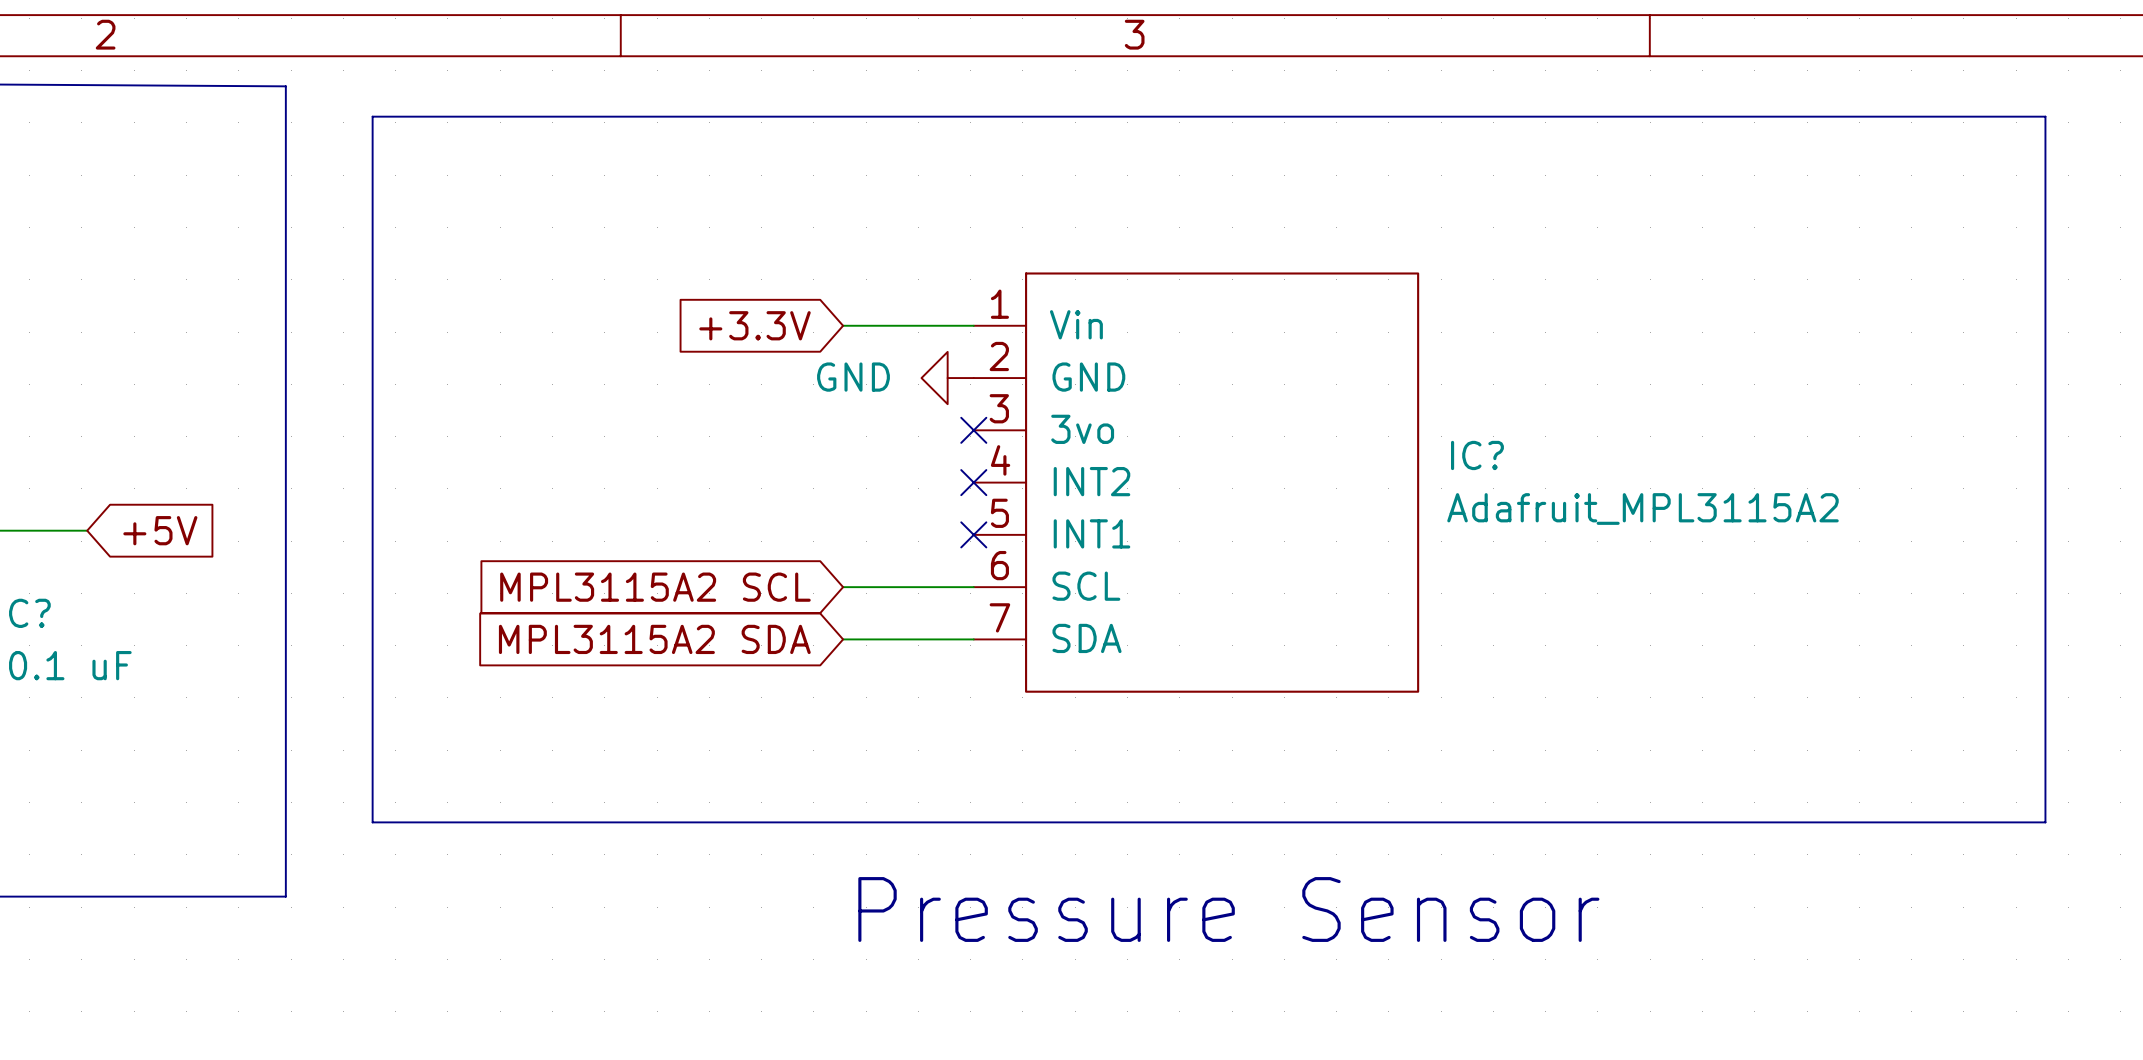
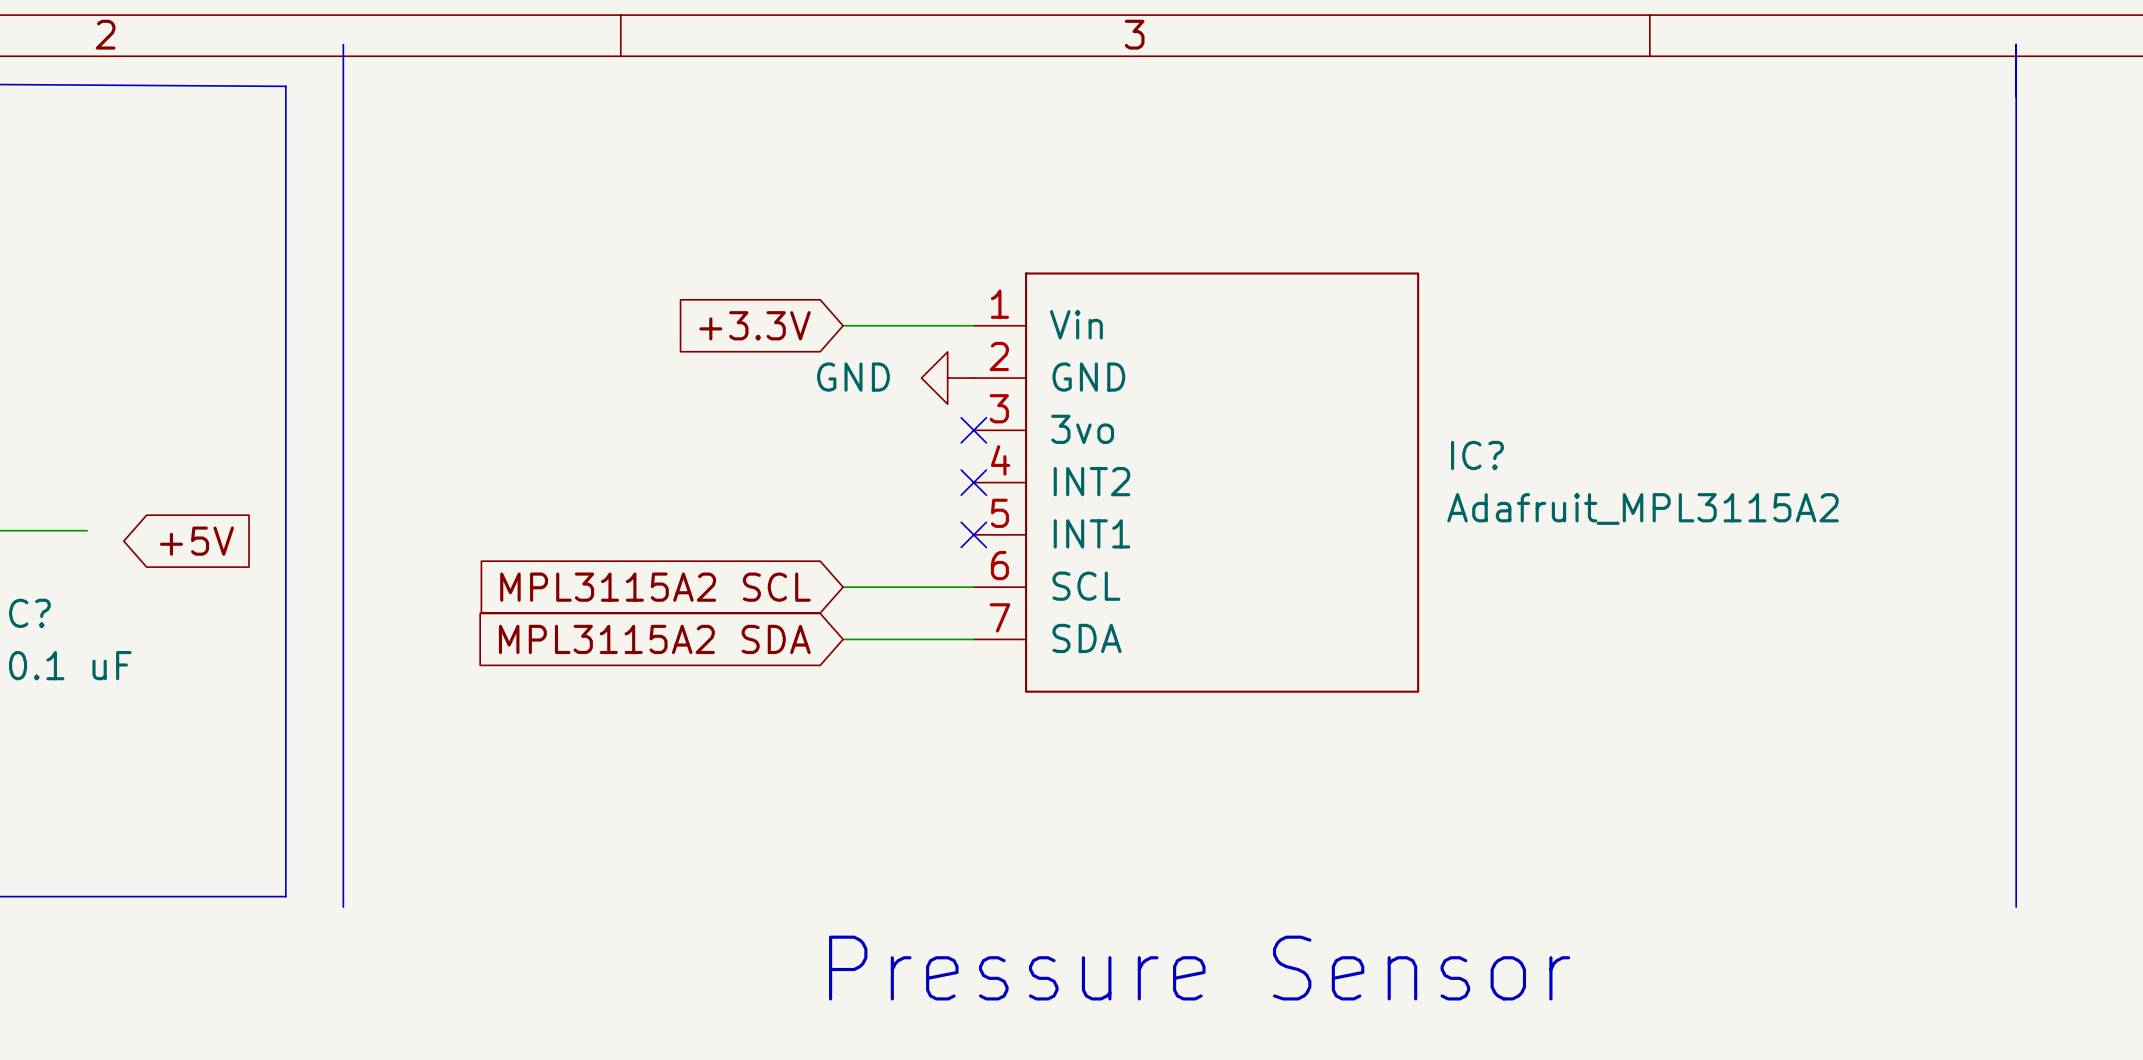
line: none -> (343, 44) (343, 907)
line: none -> (2016, 44) (2016, 907)
line: (372, 116) (372, 822) (2045, 822) (2045, 116) (372, 116) -> none
global label position: +5V (160, 530) -> +5V (196, 541)
text position: Pressure Sensor (1228, 909) -> Pressure Sensor (1199, 968)

